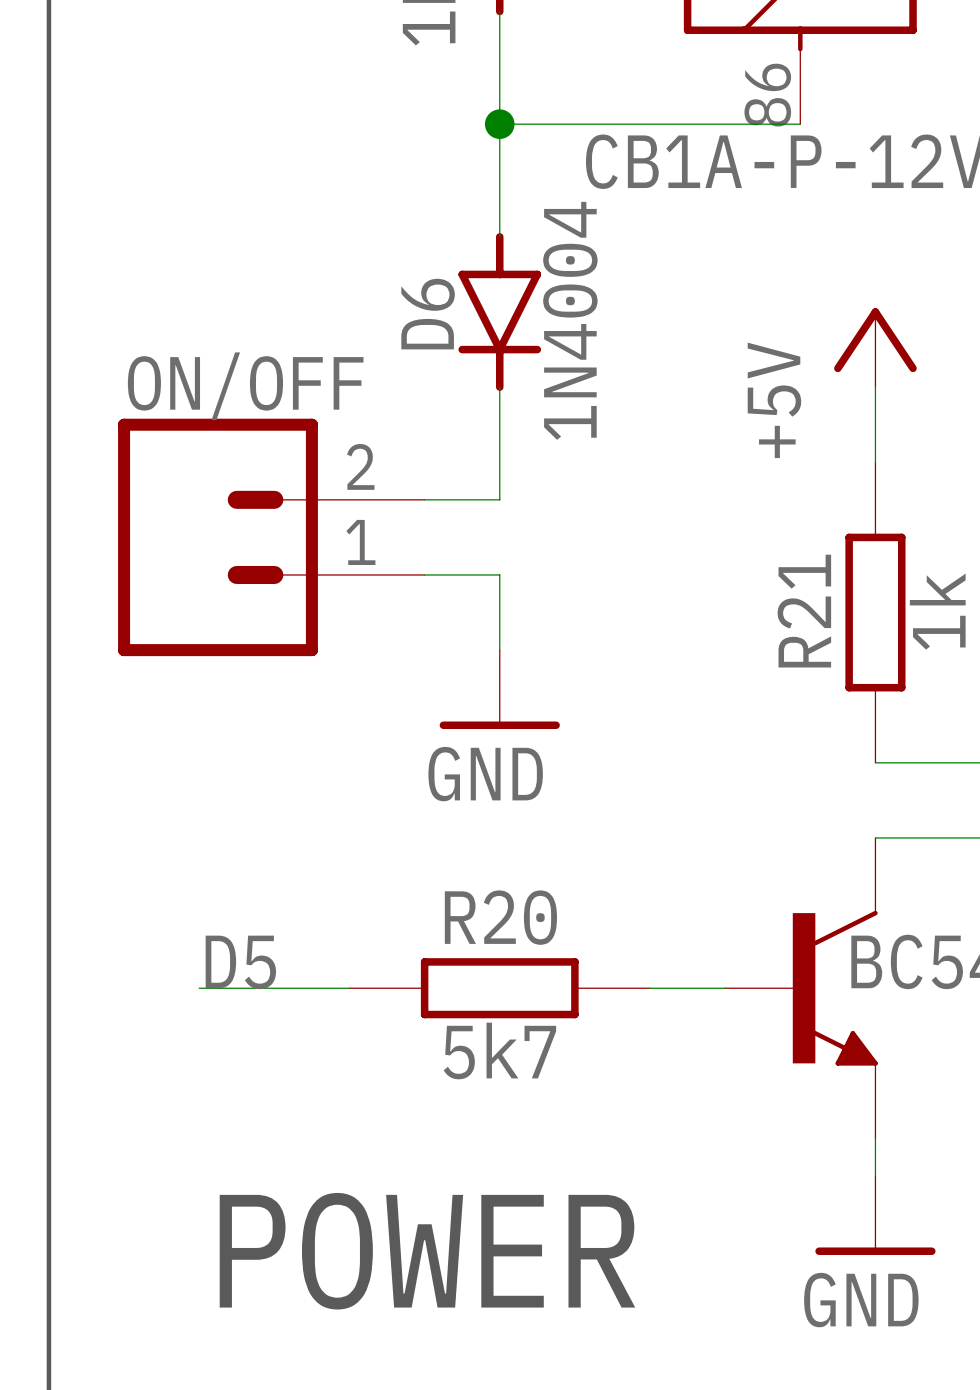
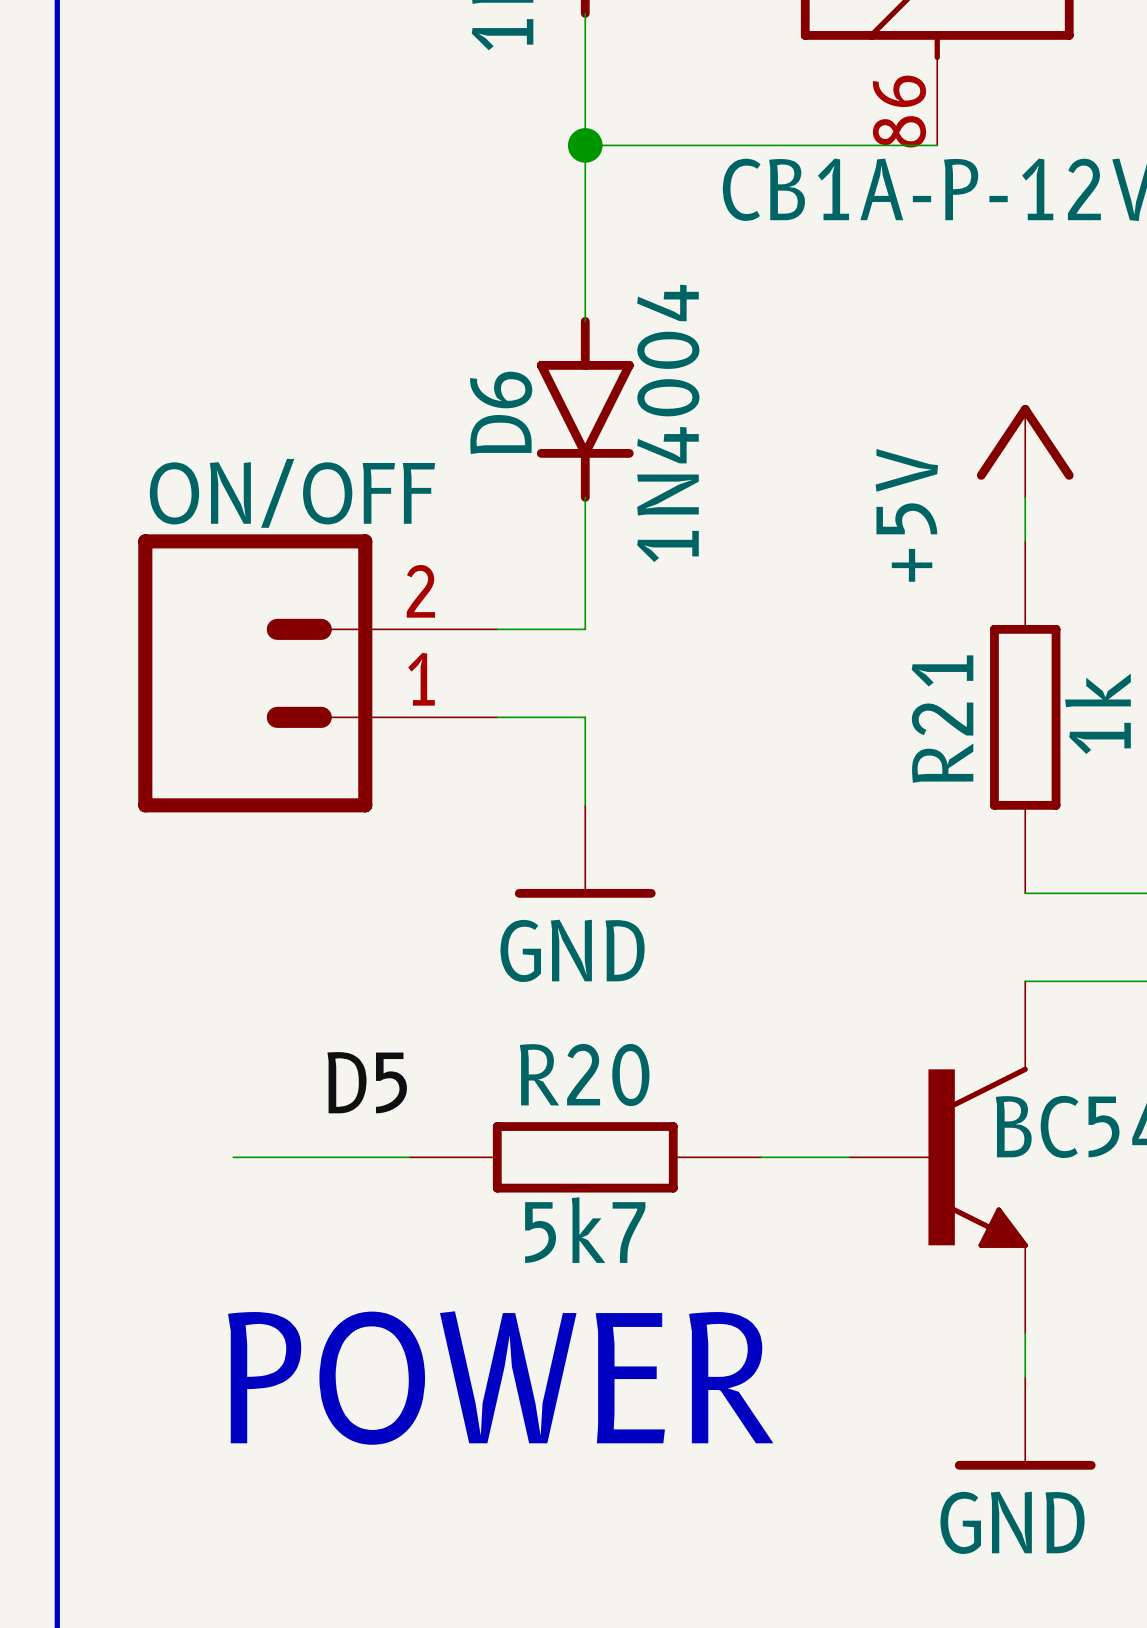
D6 position: (499, 312) -> (585, 409)
power symbol position: +5V (875, 347) -> +5V (1025, 451)
wire: (424, 499) (499, 499) -> (497, 629) (585, 629) (585, 585)
ON/OFF position: (271, 537) -> (317, 673)
wire: (424, 574) (499, 574) (499, 612) -> (497, 717) (585, 717)
power symbol position: GND (499, 689) -> GND (585, 851)
label position: D5 (240, 962) -> D5 (367, 1082)
text position: POWER (427, 1251) -> POWER (500, 1378)

